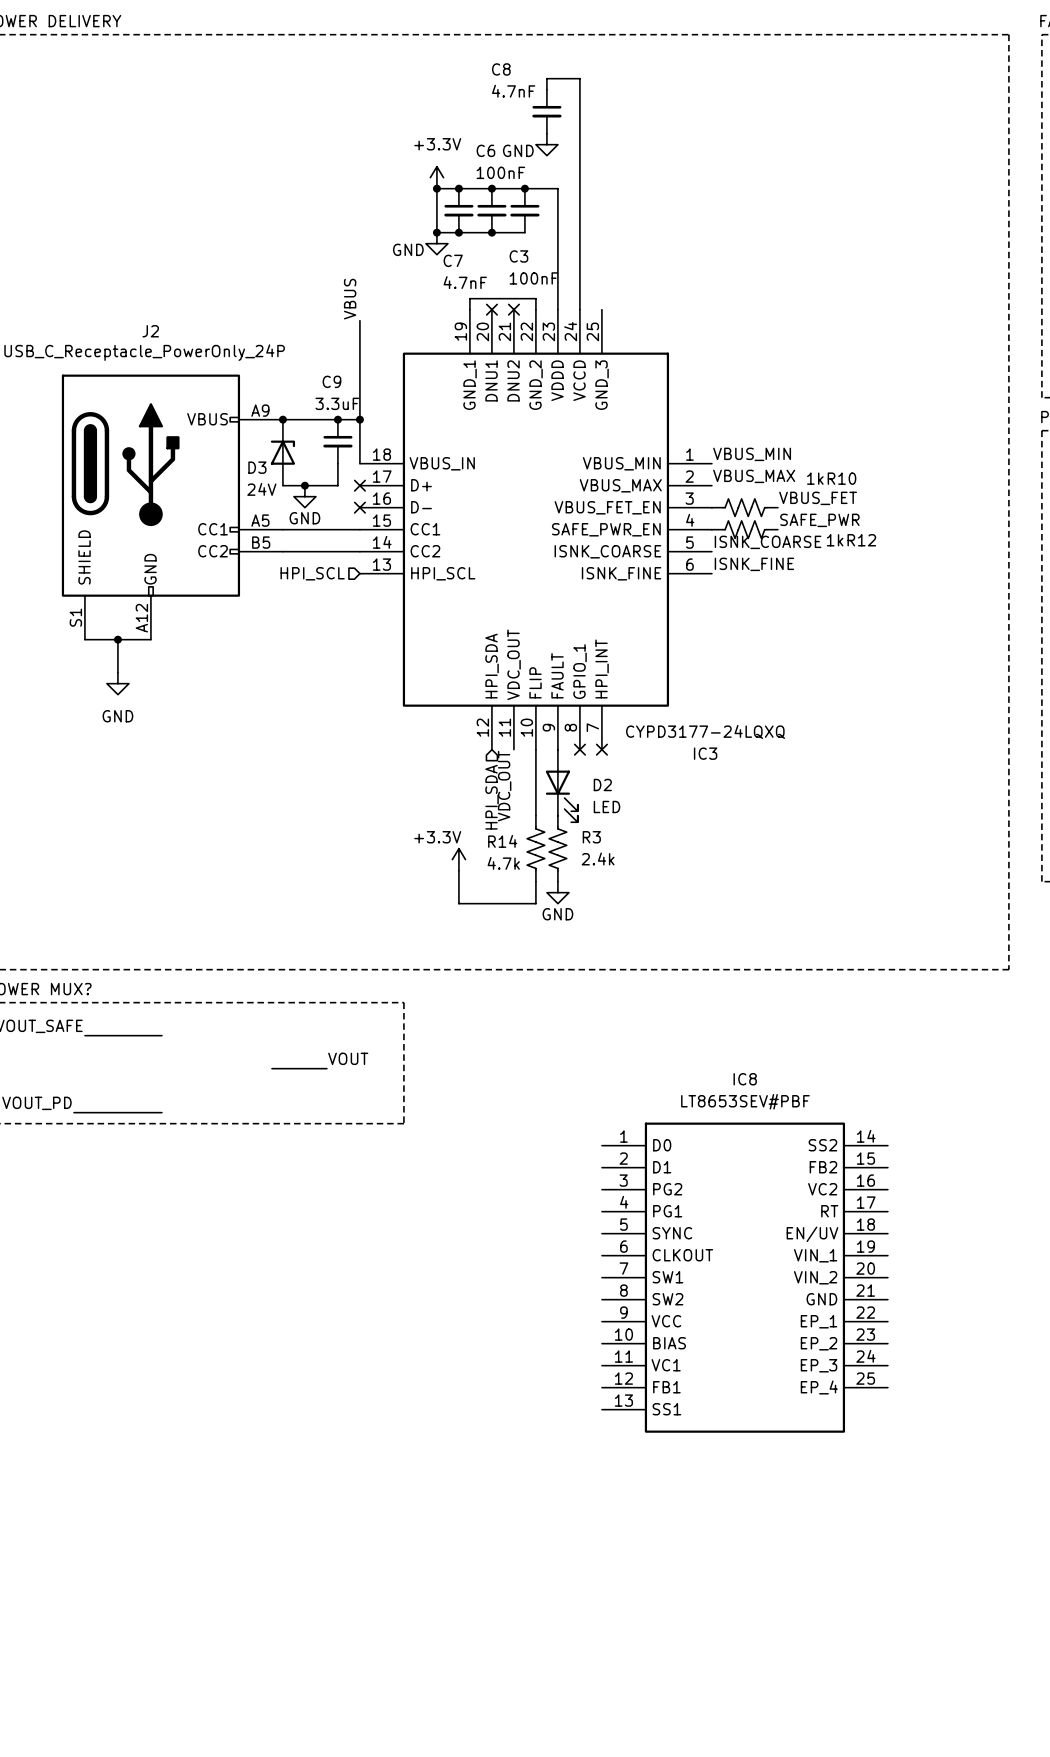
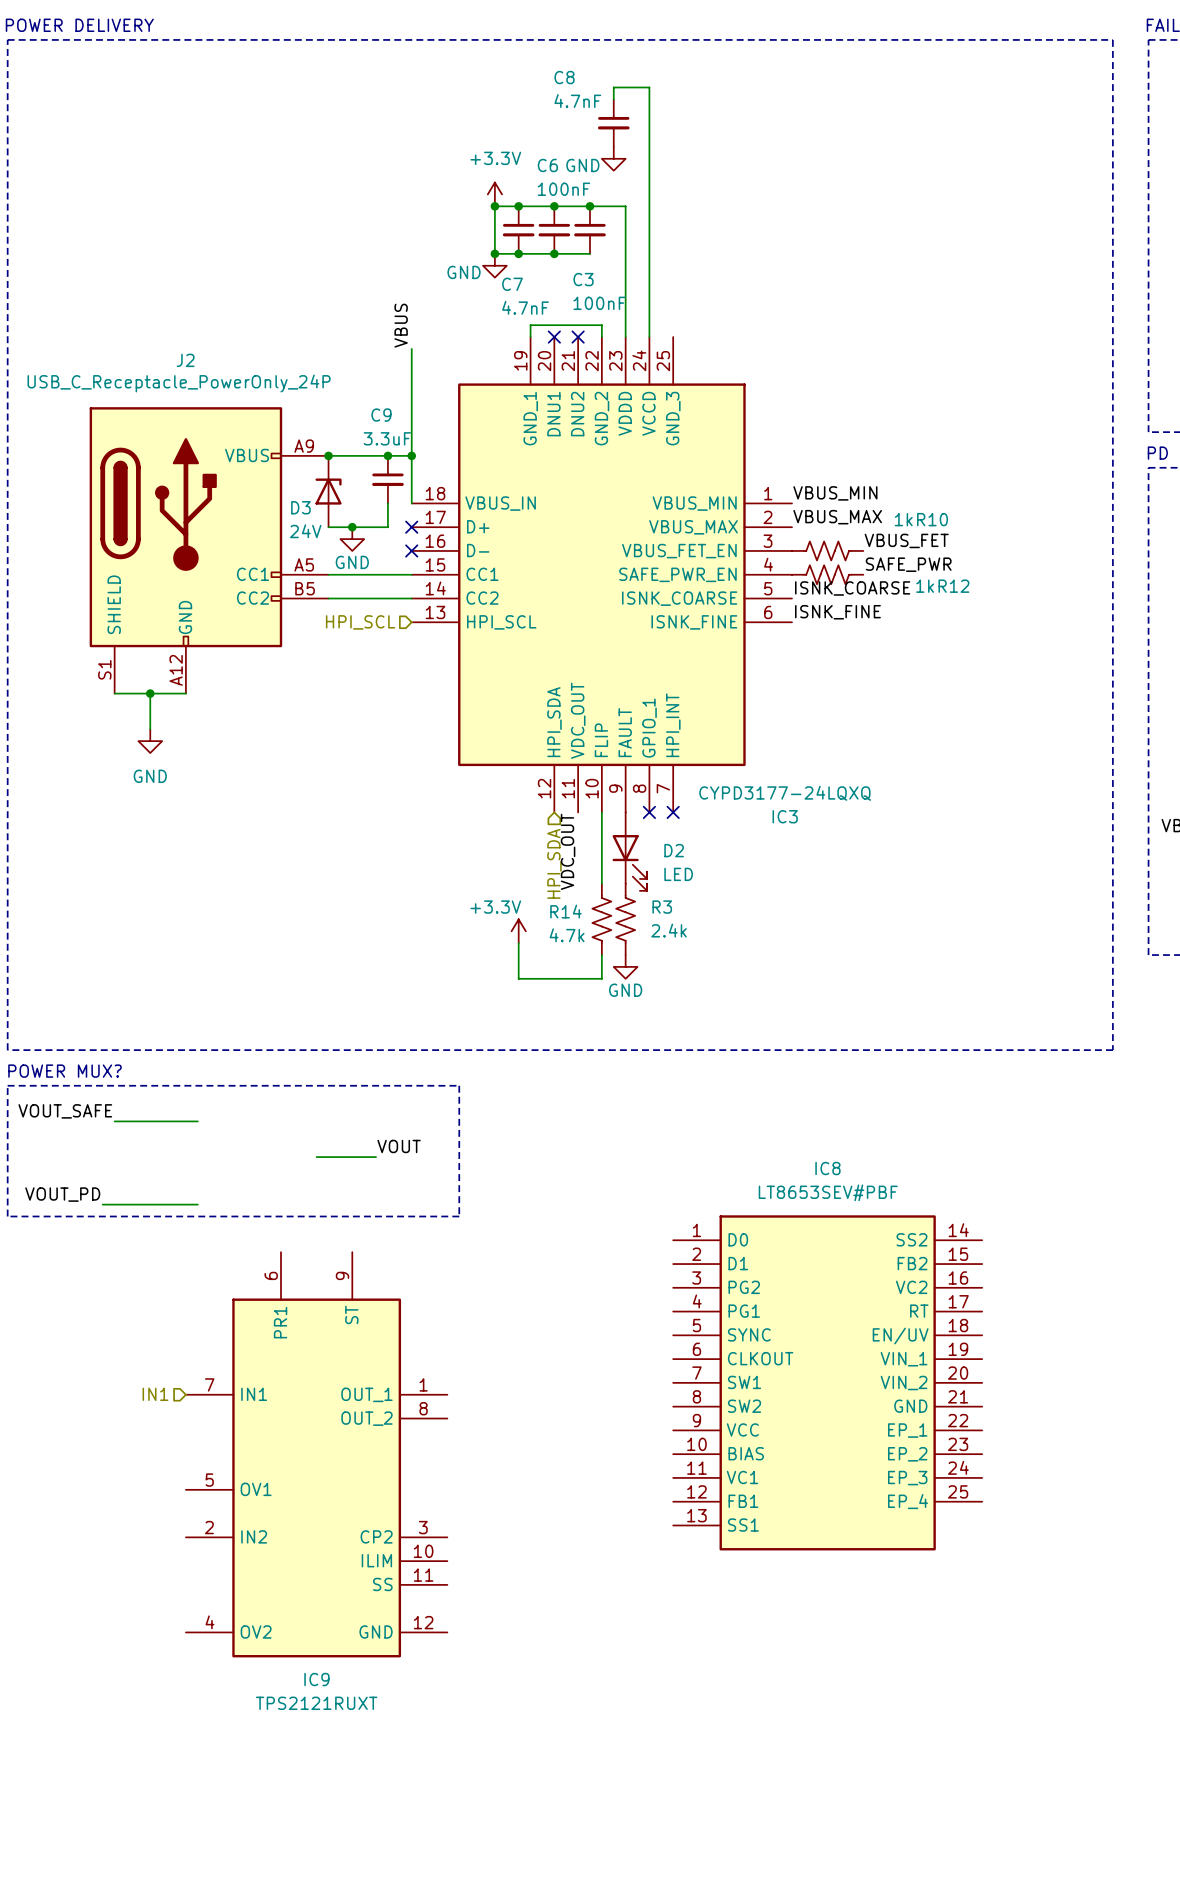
hierarchical label: none -> IN1 (155, 1394)
IC9: none -> TPS2121RUXT (316, 1454)

